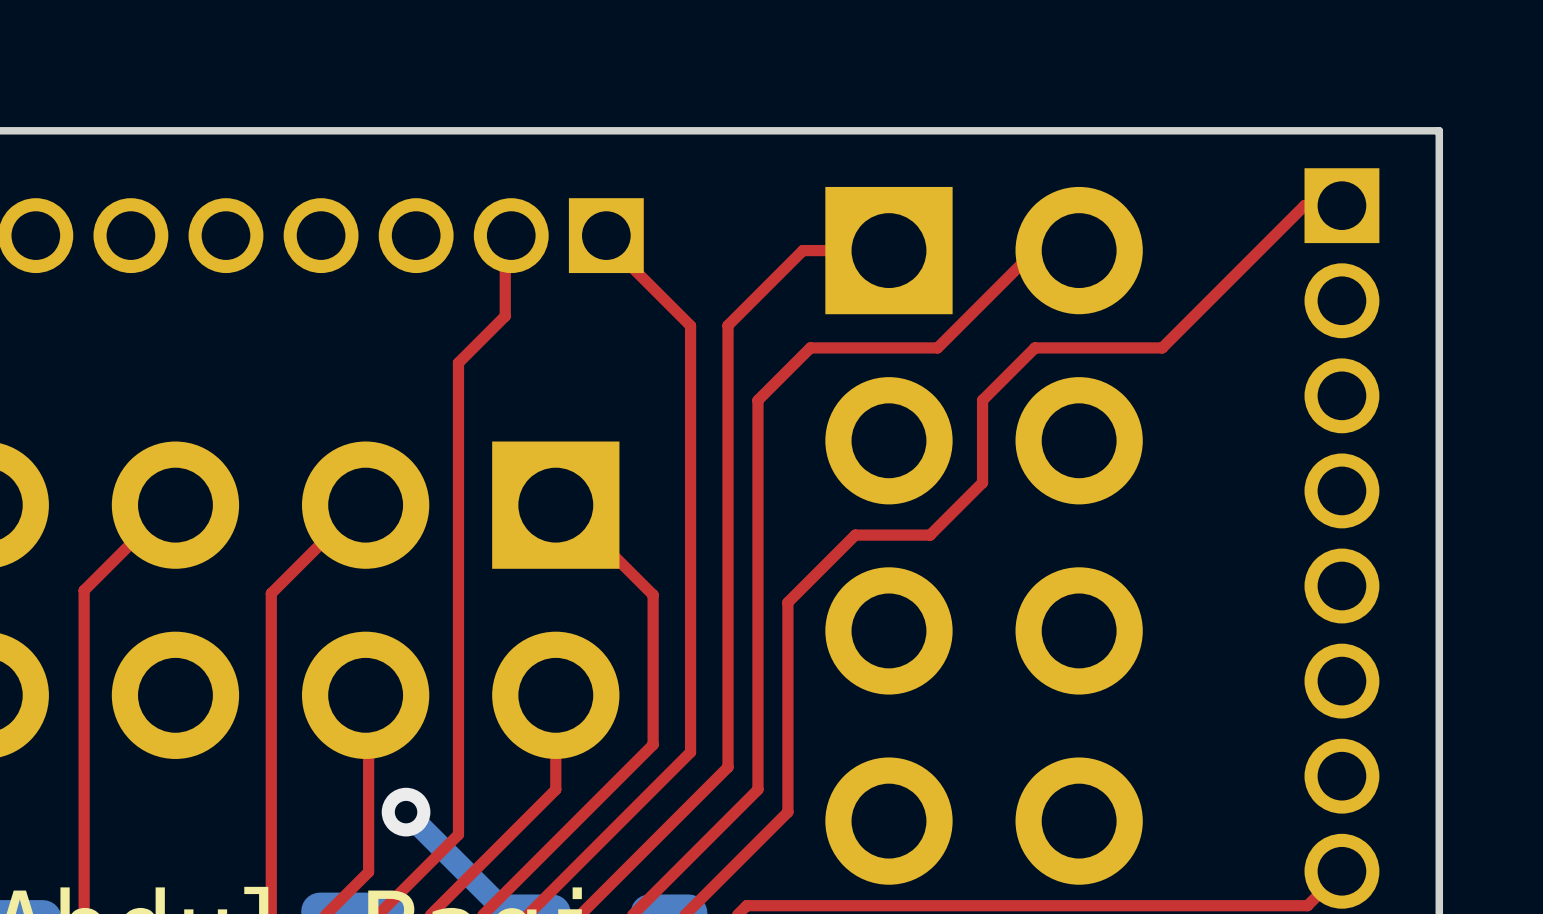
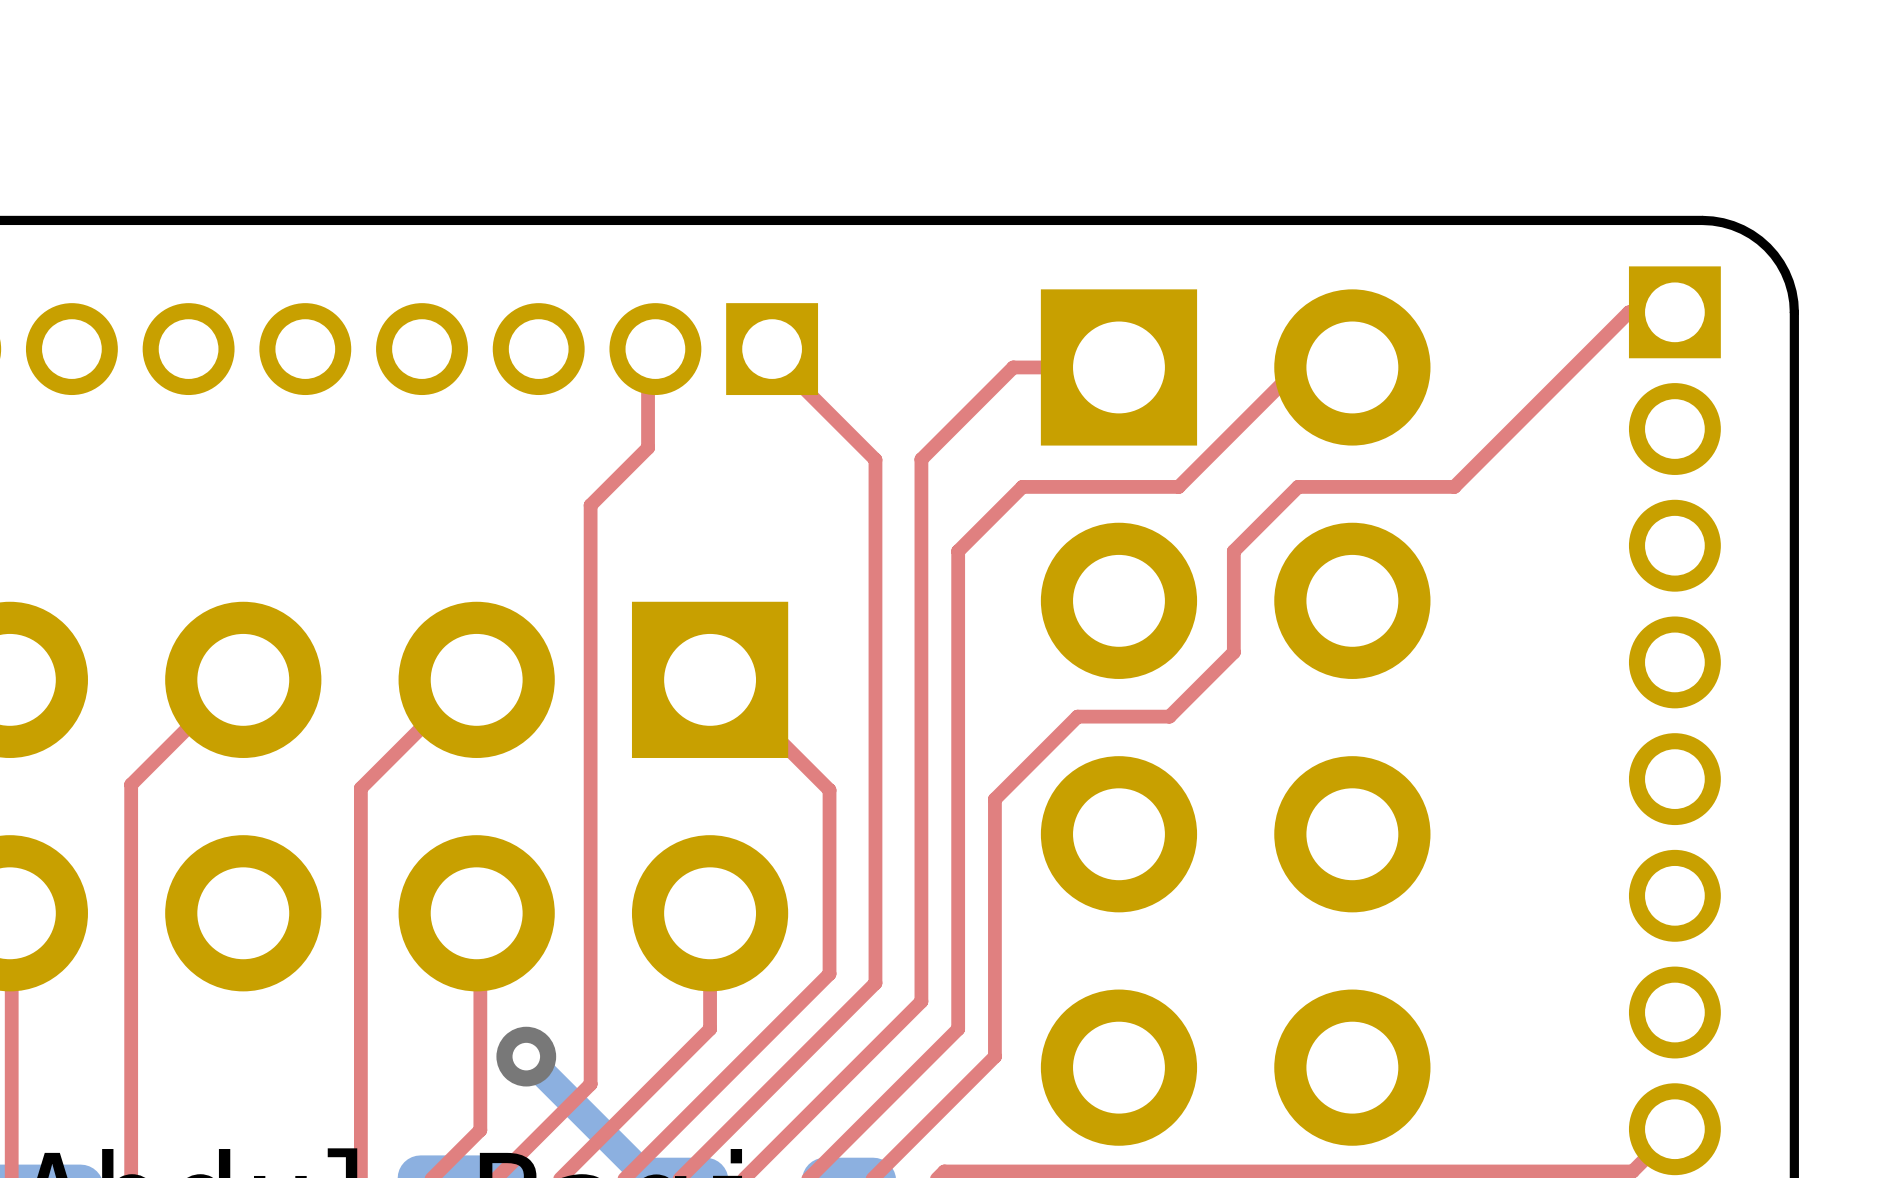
board edge: (1364, 130) (1439, 130) (1439, 205) -> (1702, 220) (1732, 225) (1751, 234) (1767, 247) (1785, 272) (1792, 291) (1794, 312)

